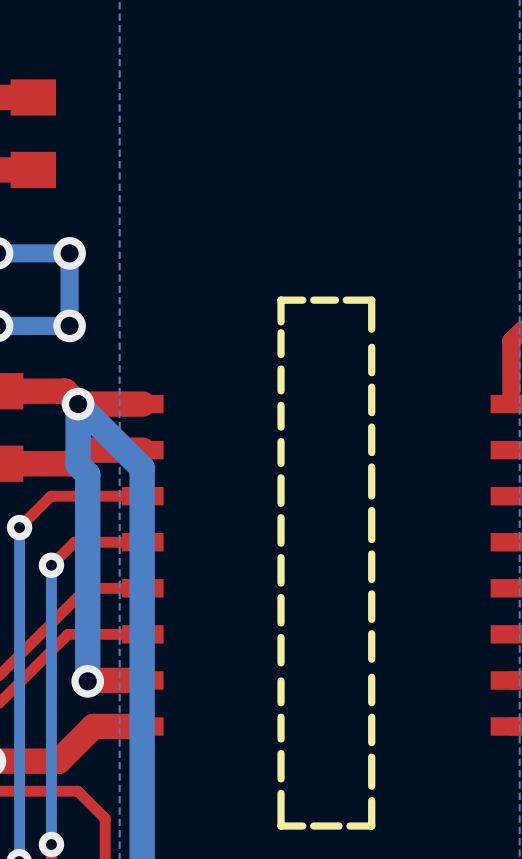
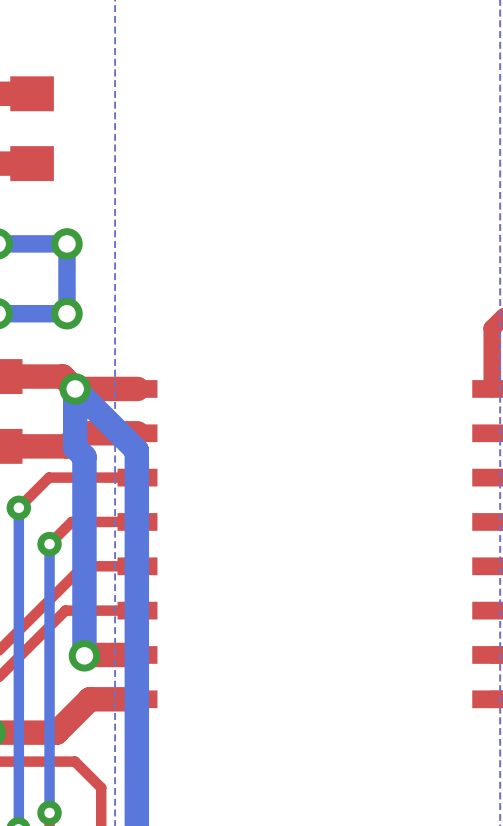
line: (302, 300) (281, 300) (281, 321) -> none
line: (335, 300) (313, 300) -> none
line: (346, 300) (371, 300) (371, 329) -> none
line: (281, 332) (281, 354) -> none
line: (371, 347) (371, 372) -> none
line: (281, 369) (281, 390) -> none
line: (371, 387) (371, 412) -> none
line: (281, 405) (281, 427) -> none
line: (371, 427) (371, 452) -> none
line: (281, 441) (281, 463) -> none
line: (371, 466) (371, 496) -> none
line: (281, 477) (281, 503) -> none
line: (371, 510) (371, 539) -> none
line: (281, 517) (281, 543) -> none
line: (371, 554) (371, 579) -> none
line: (281, 557) (281, 583) -> none
line: (371, 593) (371, 619) -> none
line: (281, 597) (281, 622) -> none
line: (371, 633) (371, 659) -> none
line: (281, 637) (281, 662) -> none
line: (371, 677) (371, 702) -> none
line: (281, 680) (281, 702) -> none
line: (281, 717) (281, 739) -> none
line: (371, 717) (371, 742) -> none
line: (281, 753) (281, 778) -> none
line: (371, 757) (371, 786) -> none
line: (281, 793) (281, 826) (302, 826) -> none
line: (371, 800) (371, 826) (349, 826) -> none
line: (339, 826) (313, 826) -> none

